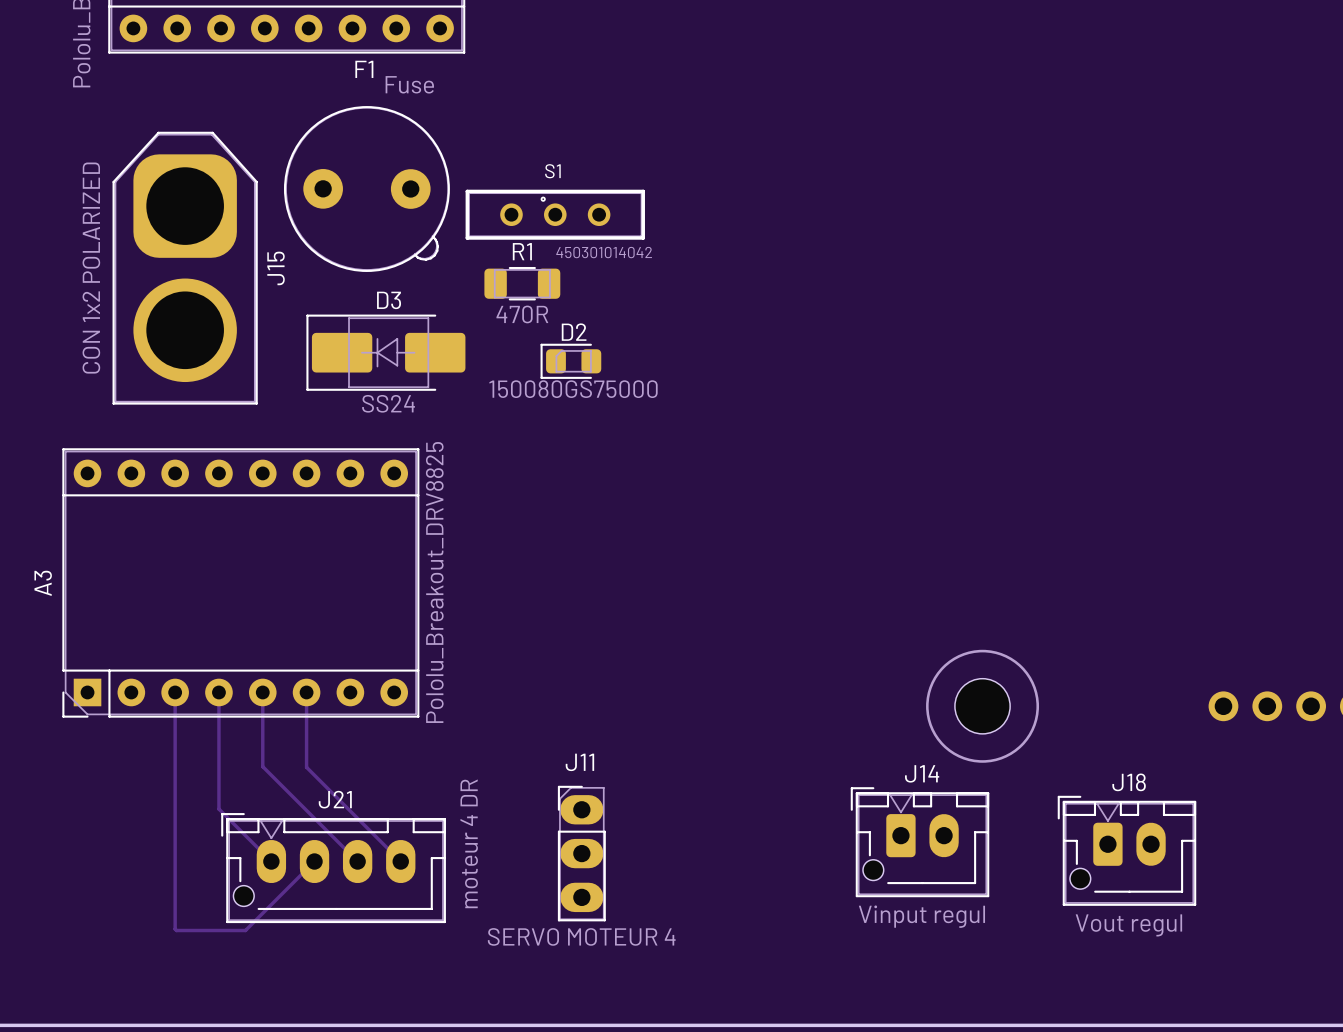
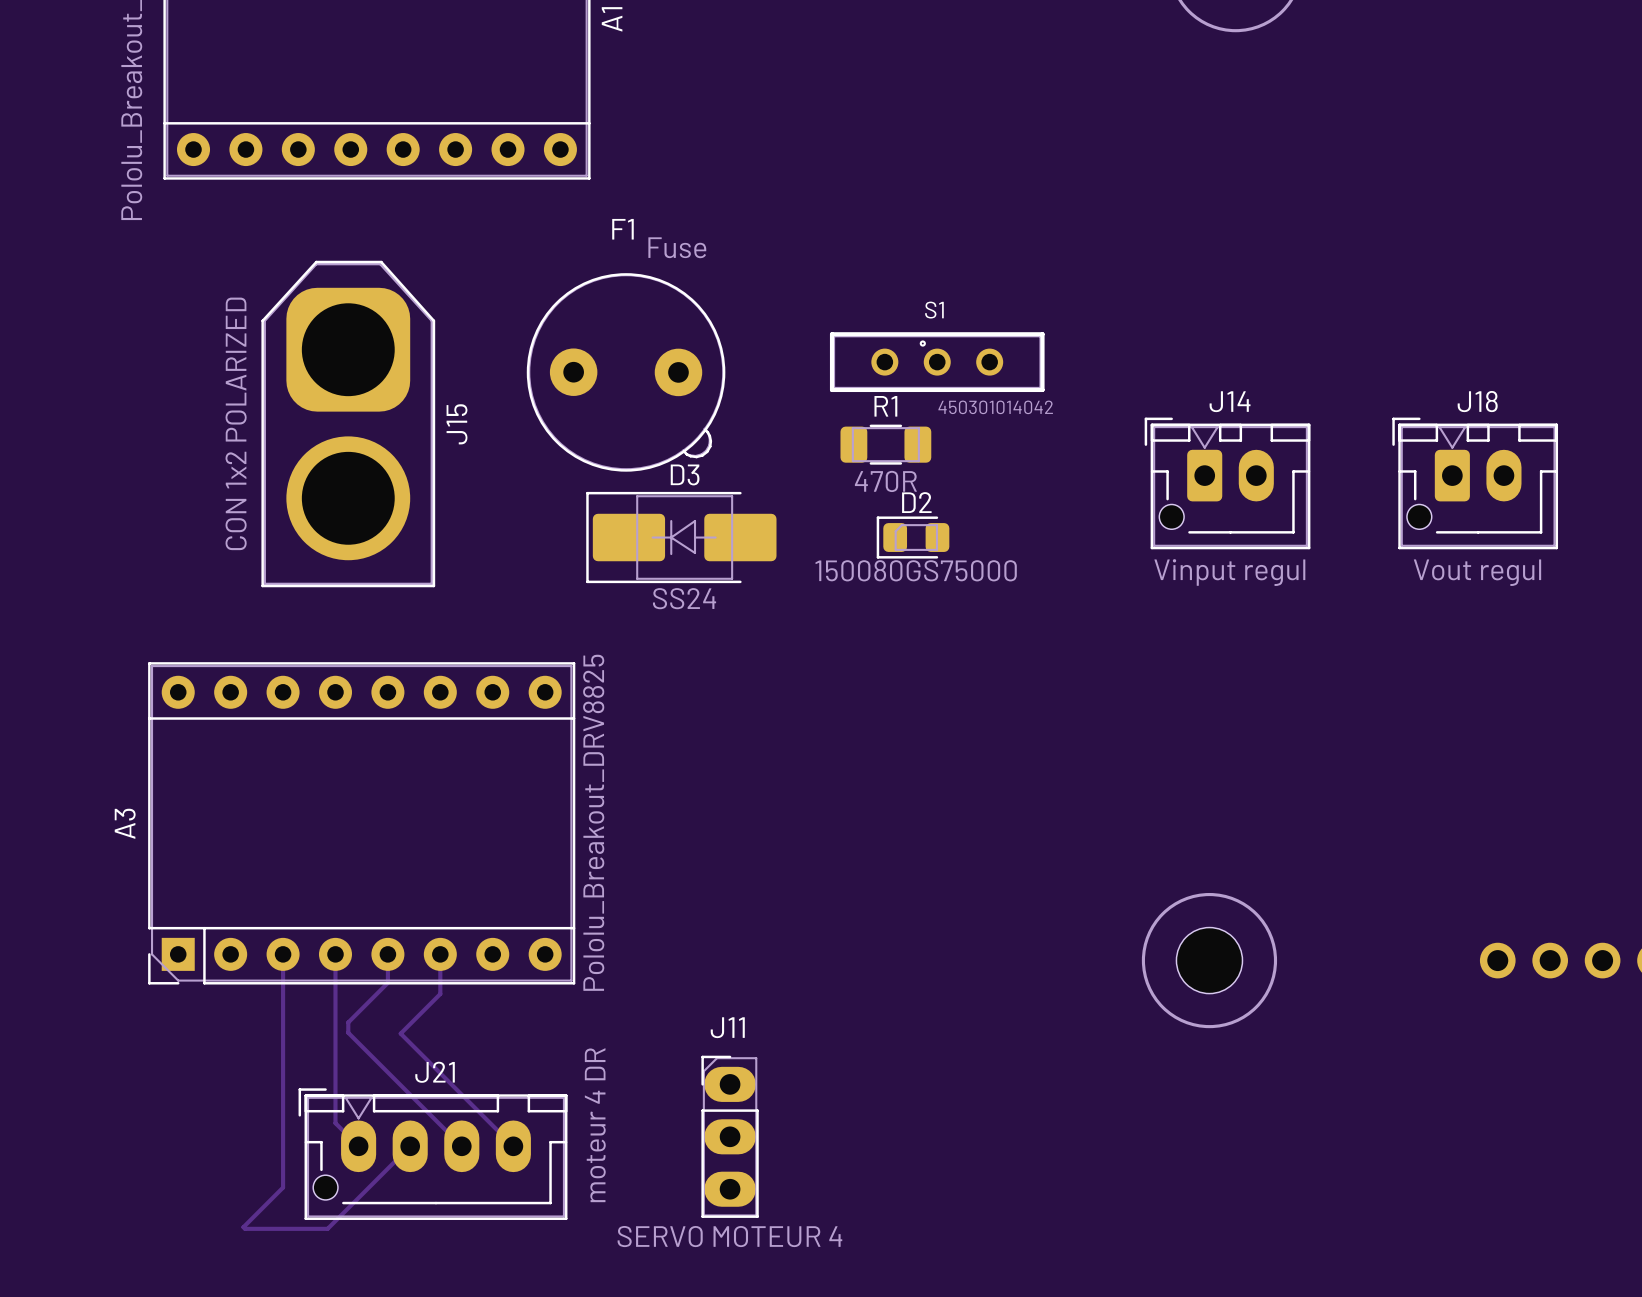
F1 position: (366, 189) -> (626, 372)
S1 position: (555, 214) -> (937, 362)
J15 position: (185, 268) -> (348, 424)
R1 position: (522, 283) -> (885, 444)
D3 position: (385, 352) -> (681, 537)
D2 position: (570, 361) -> (913, 537)
A3 position: (240, 582) -> (361, 823)
track: (175, 692) (175, 929) -> (283, 954) (283, 1187) (243, 1227)
track: (218, 692) (218, 809) (252, 842) -> (335, 954) (335, 1123)
track: (262, 692) (262, 758) -> (387, 954) (387, 982) (348, 1022)
track: (306, 692) (306, 767) -> (440, 954) (440, 994) (400, 1033)
J14 position: (920, 842) -> (1227, 483)
J18 position: (1126, 850) -> (1475, 483)

